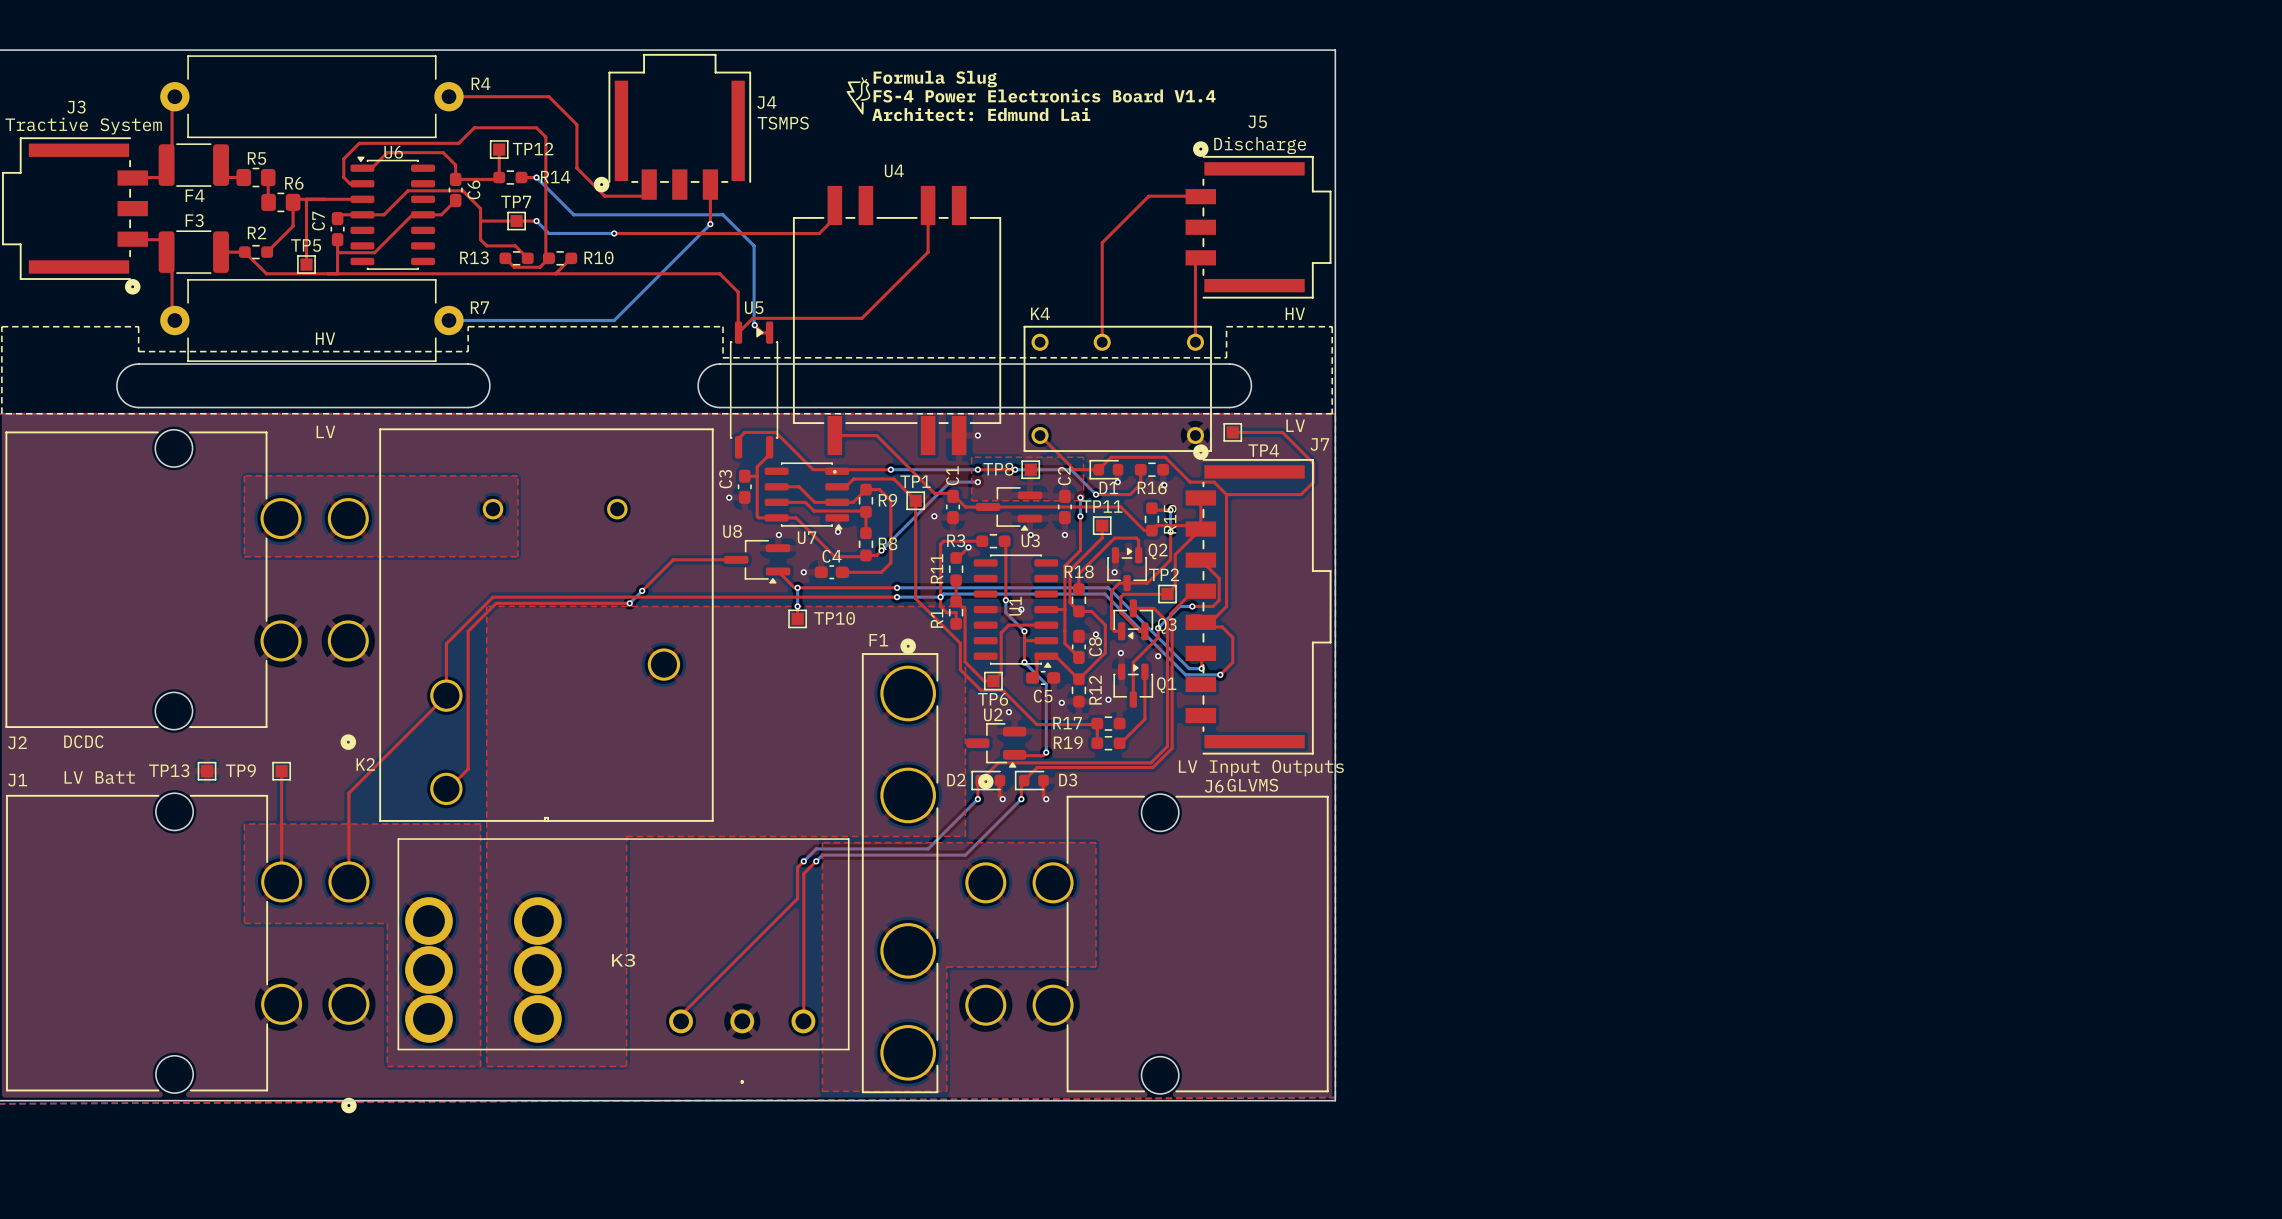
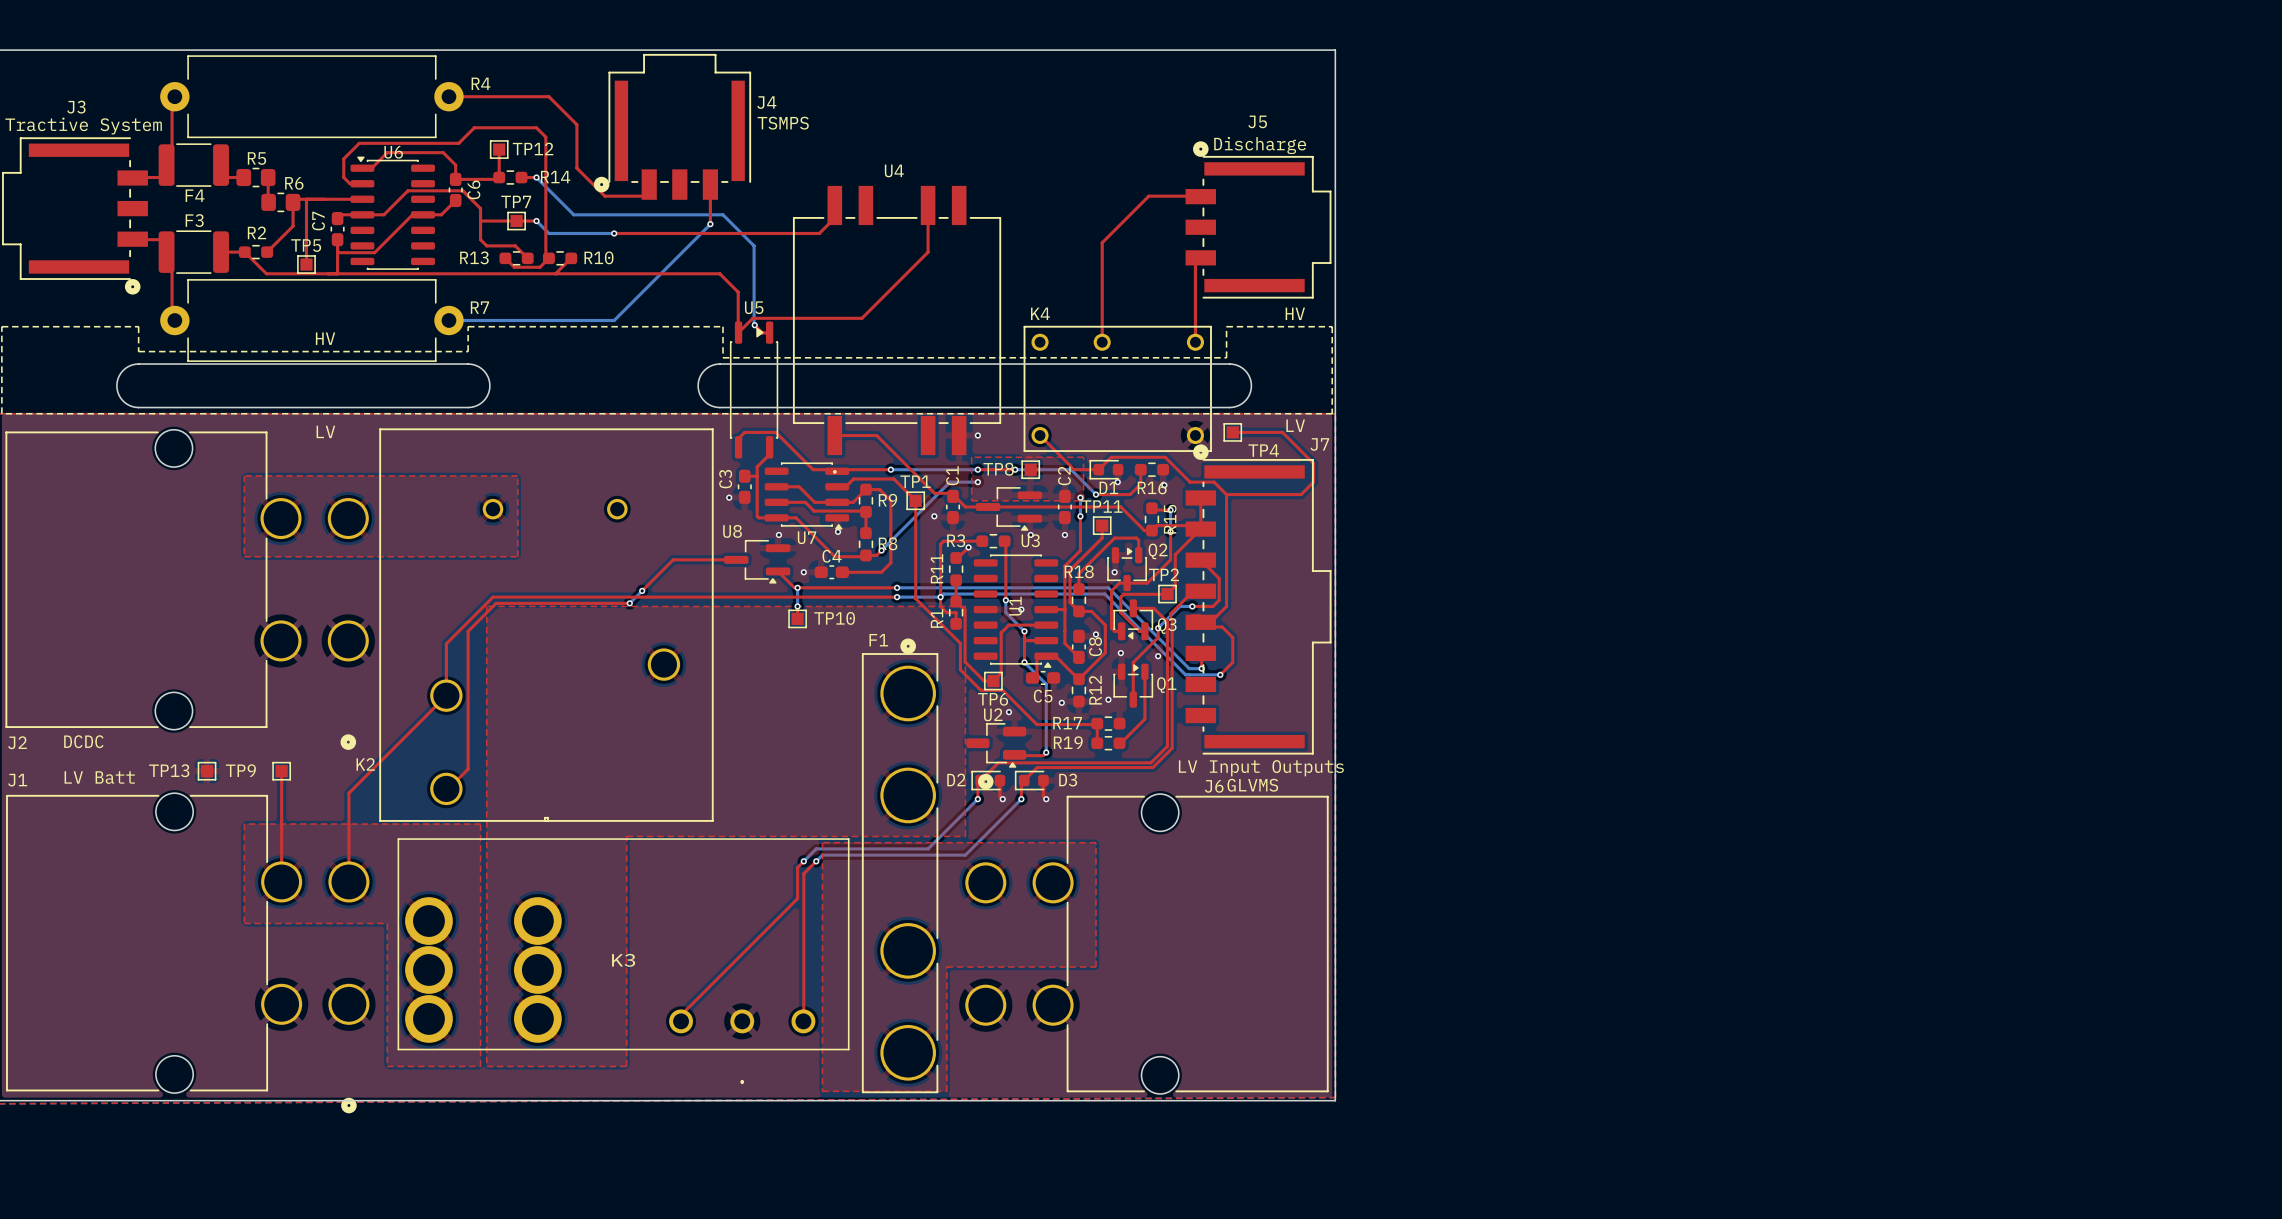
drawing: [846, 77, 871, 115] -> none

